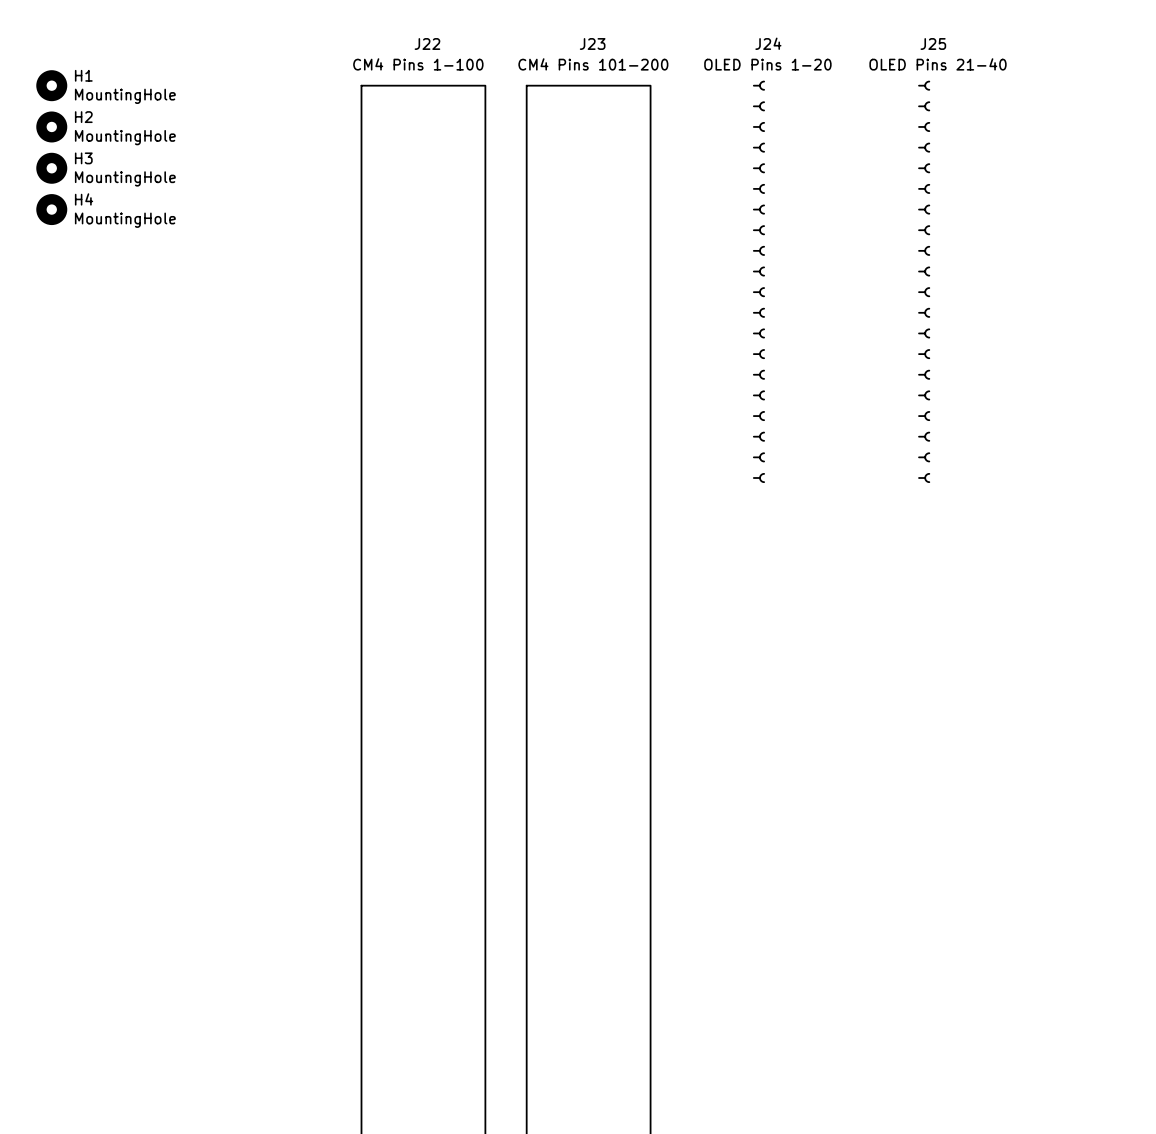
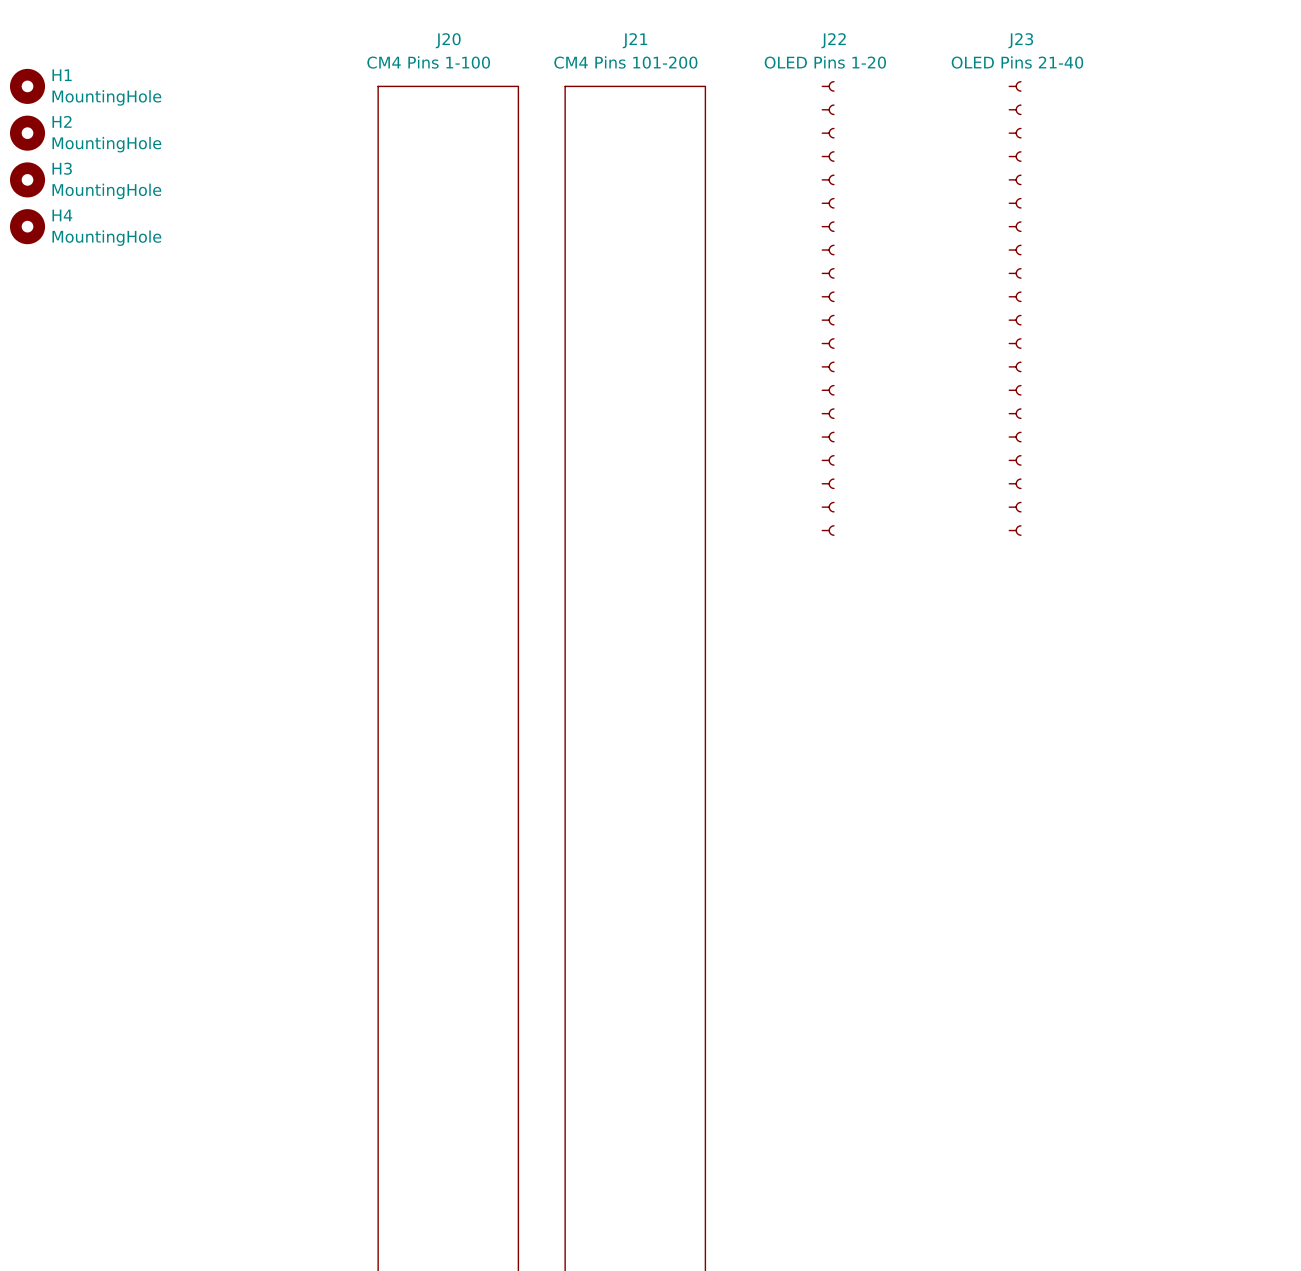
J22 name: J22 (427, 43) -> J20 (448, 40)
J23 name: J23 (592, 43) -> J21 (634, 40)
J24 name: J24 (768, 43) -> J22 (833, 40)
J25 name: J25 (933, 43) -> J23 (1020, 40)

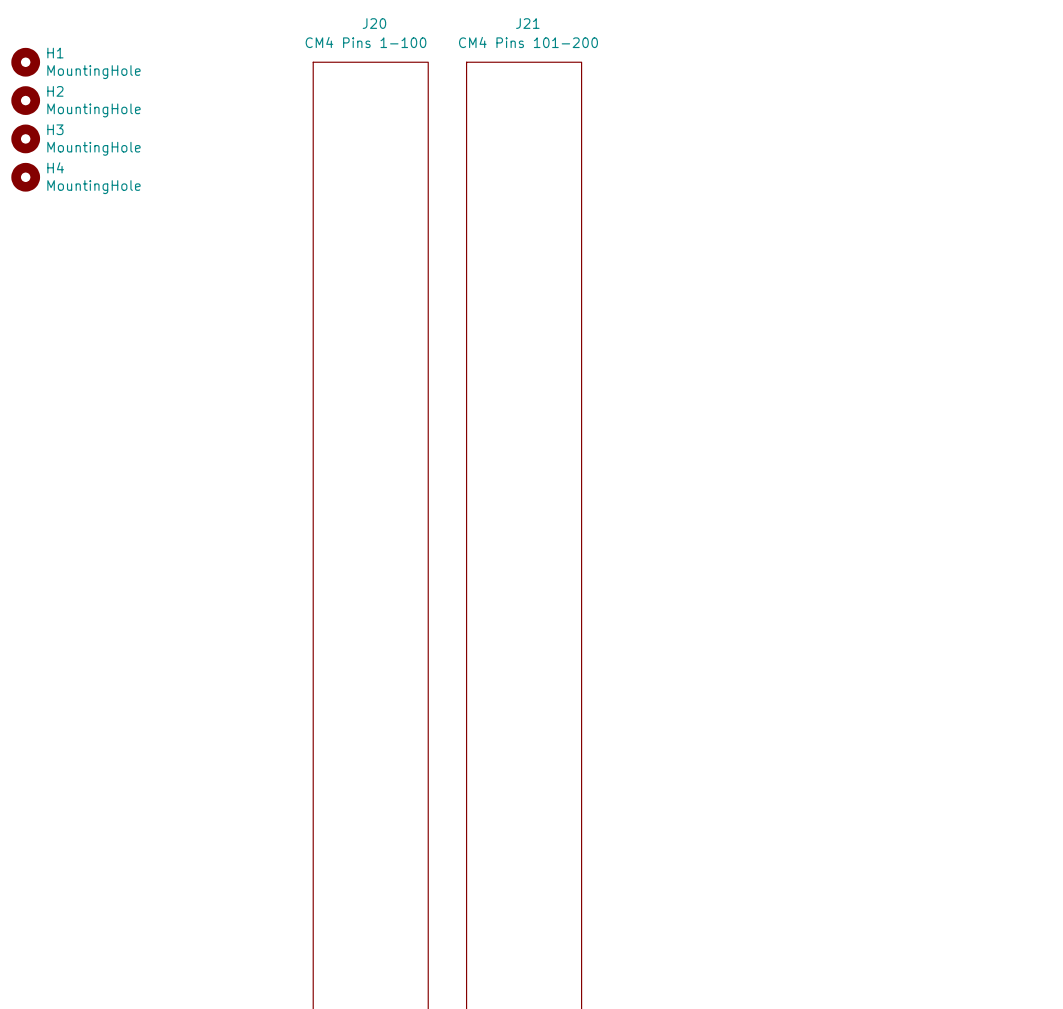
J22: OLED Pins 1-20 (828, 308) -> none
J23: OLED Pins 21-40 (1015, 308) -> none

